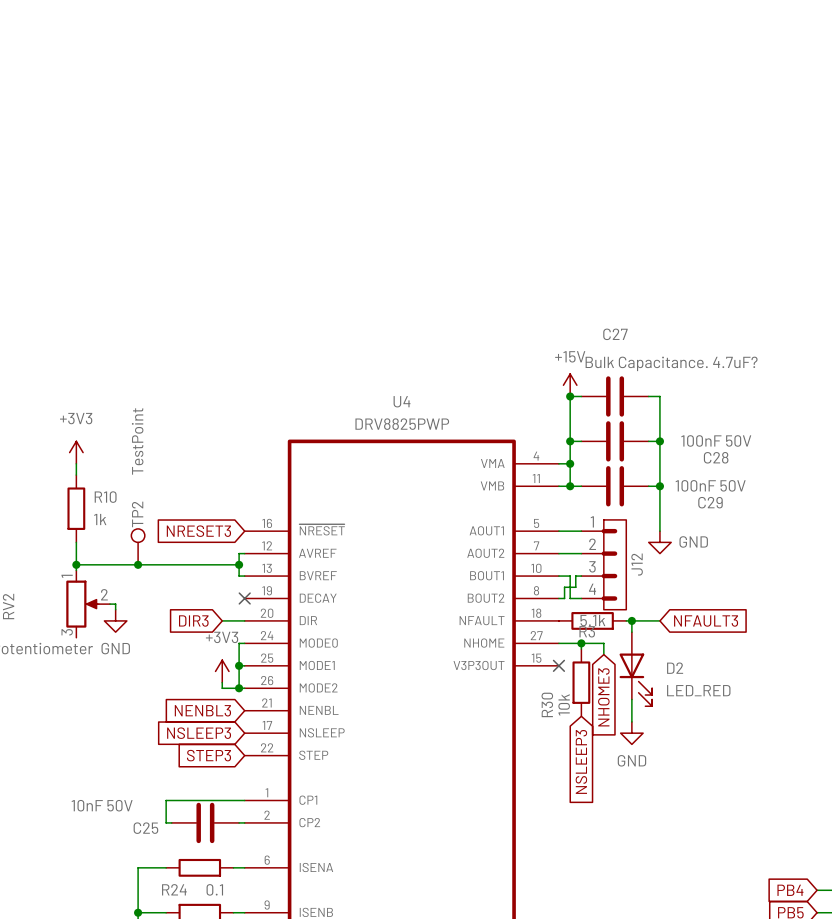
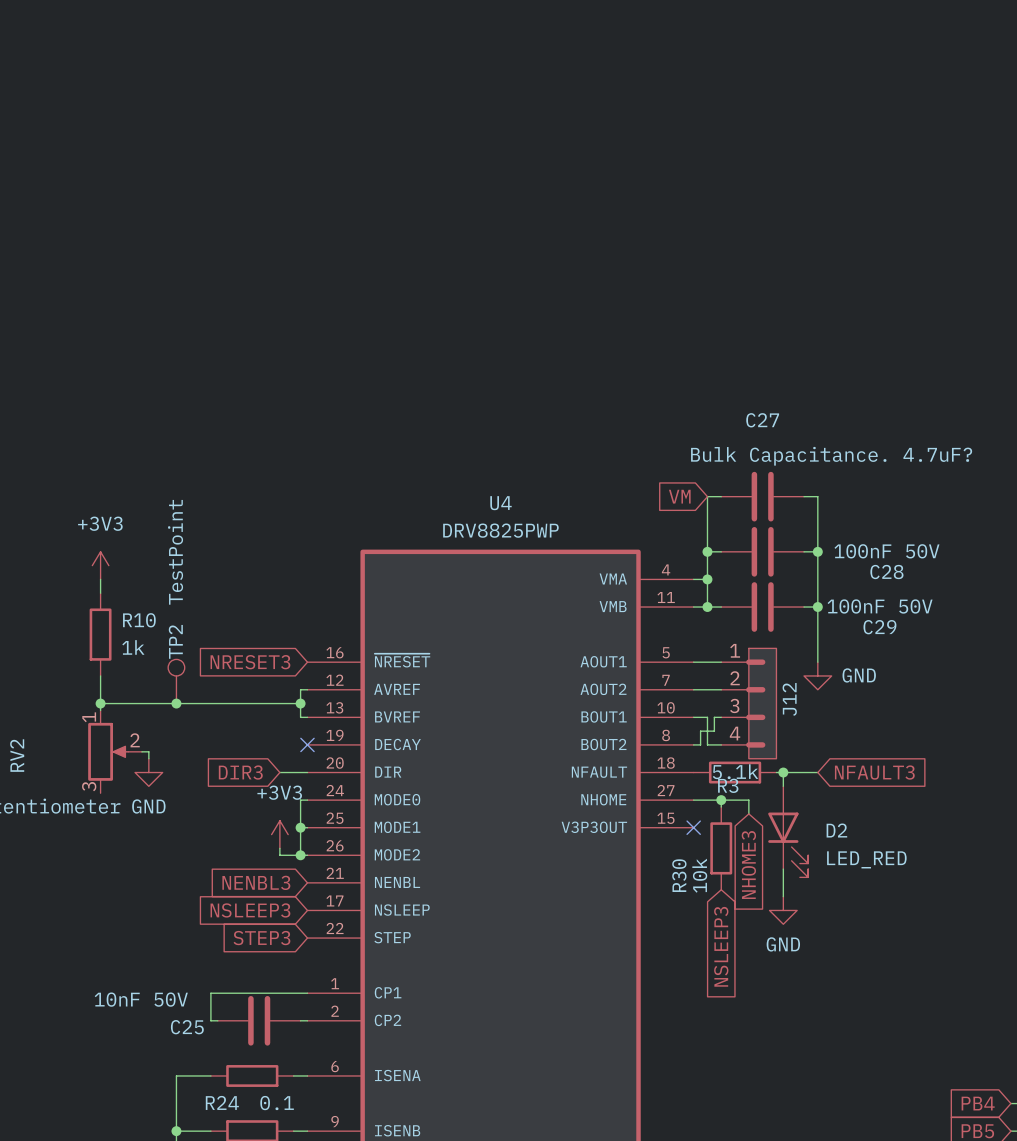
power symbol: +15V (570, 385) -> none
global label: none -> VM (679, 496)
junction: (570, 396) -> none

